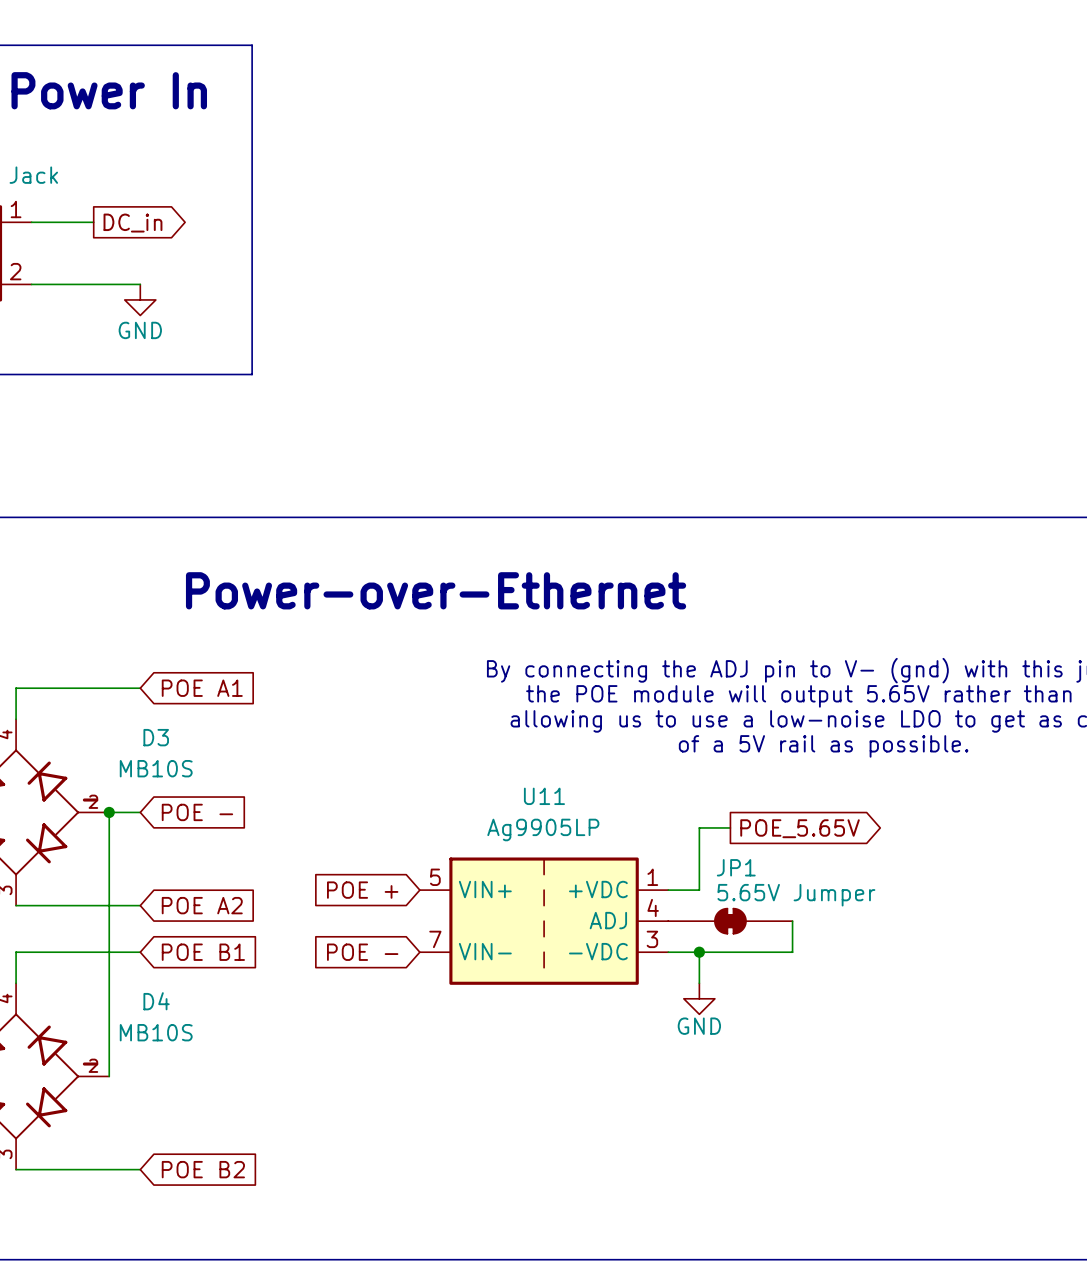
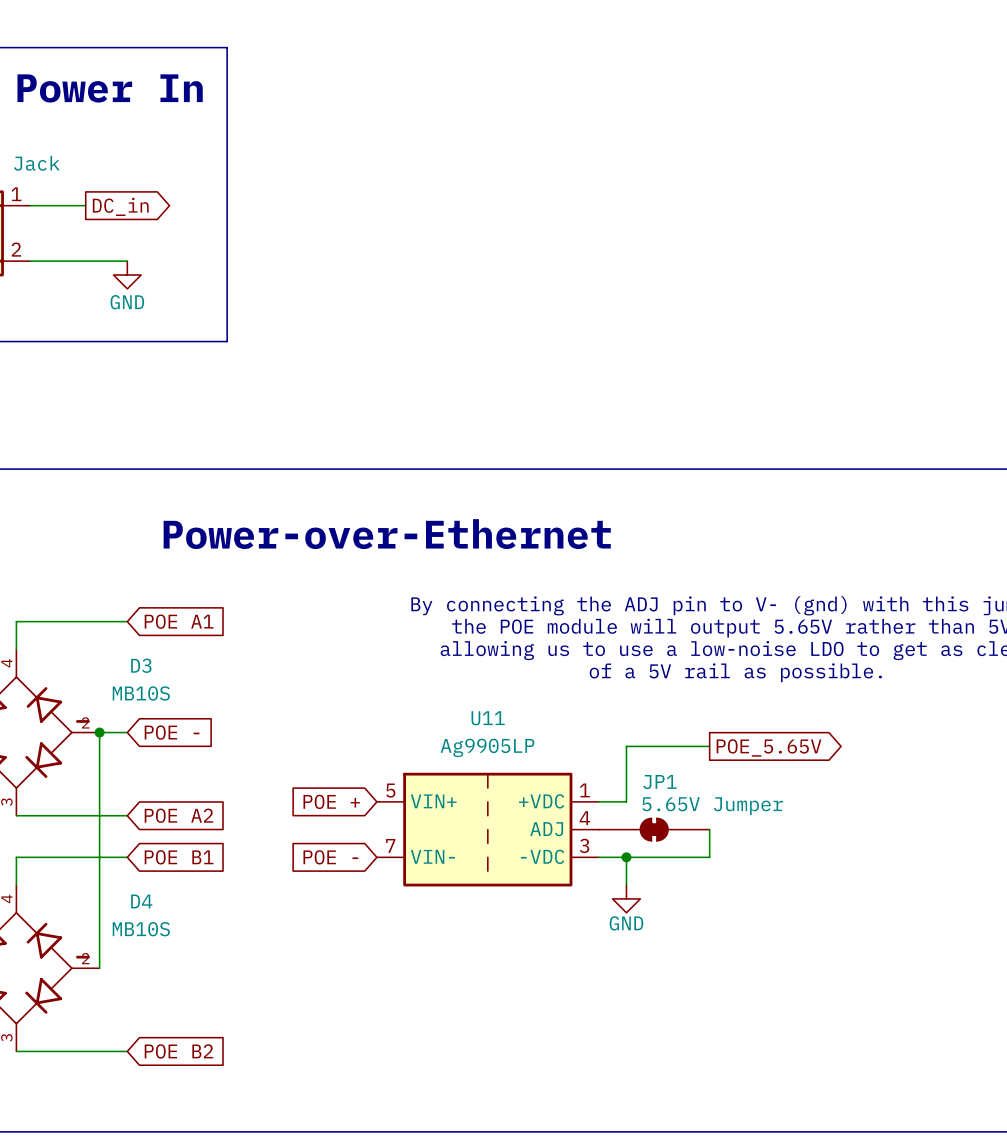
wire: none -> (654, 746) (709, 746)
global label position: POE_5.65V (800, 828) -> POE_5.65V (769, 747)

